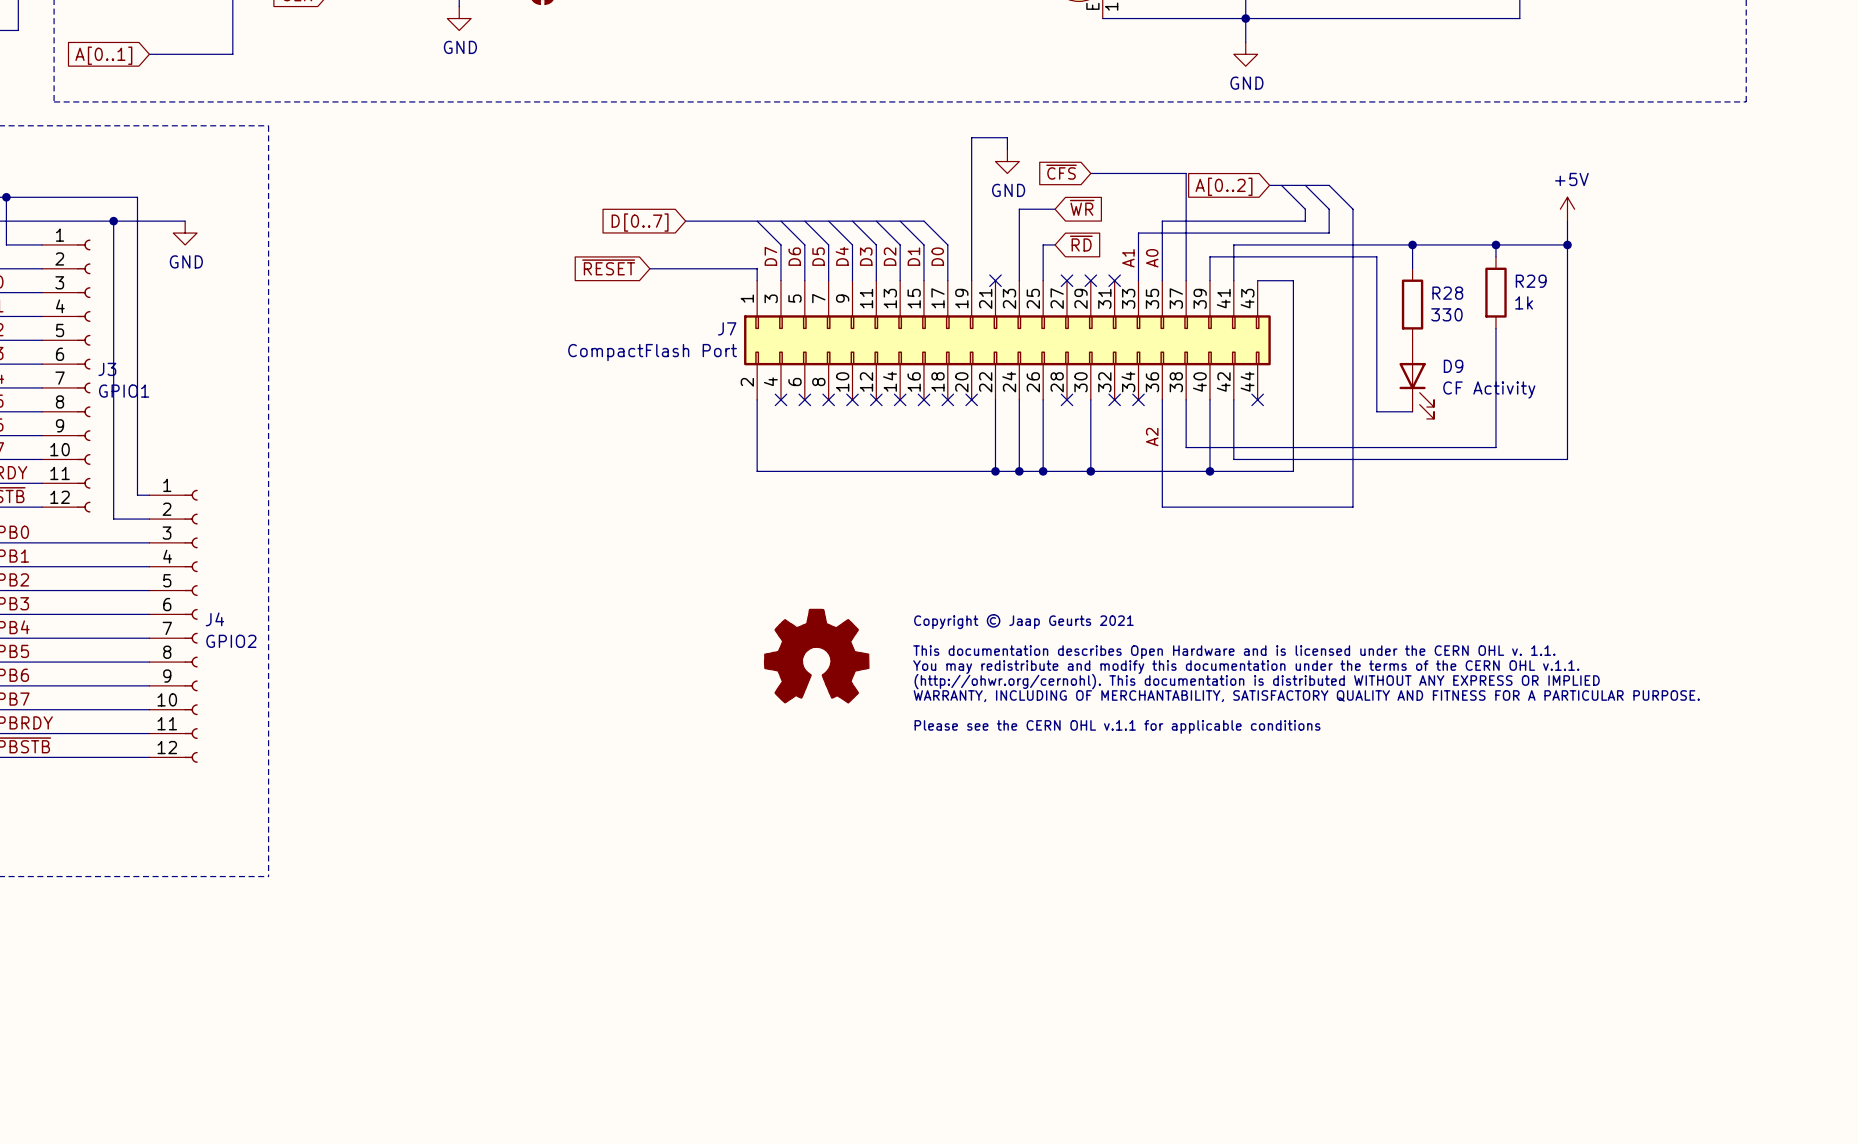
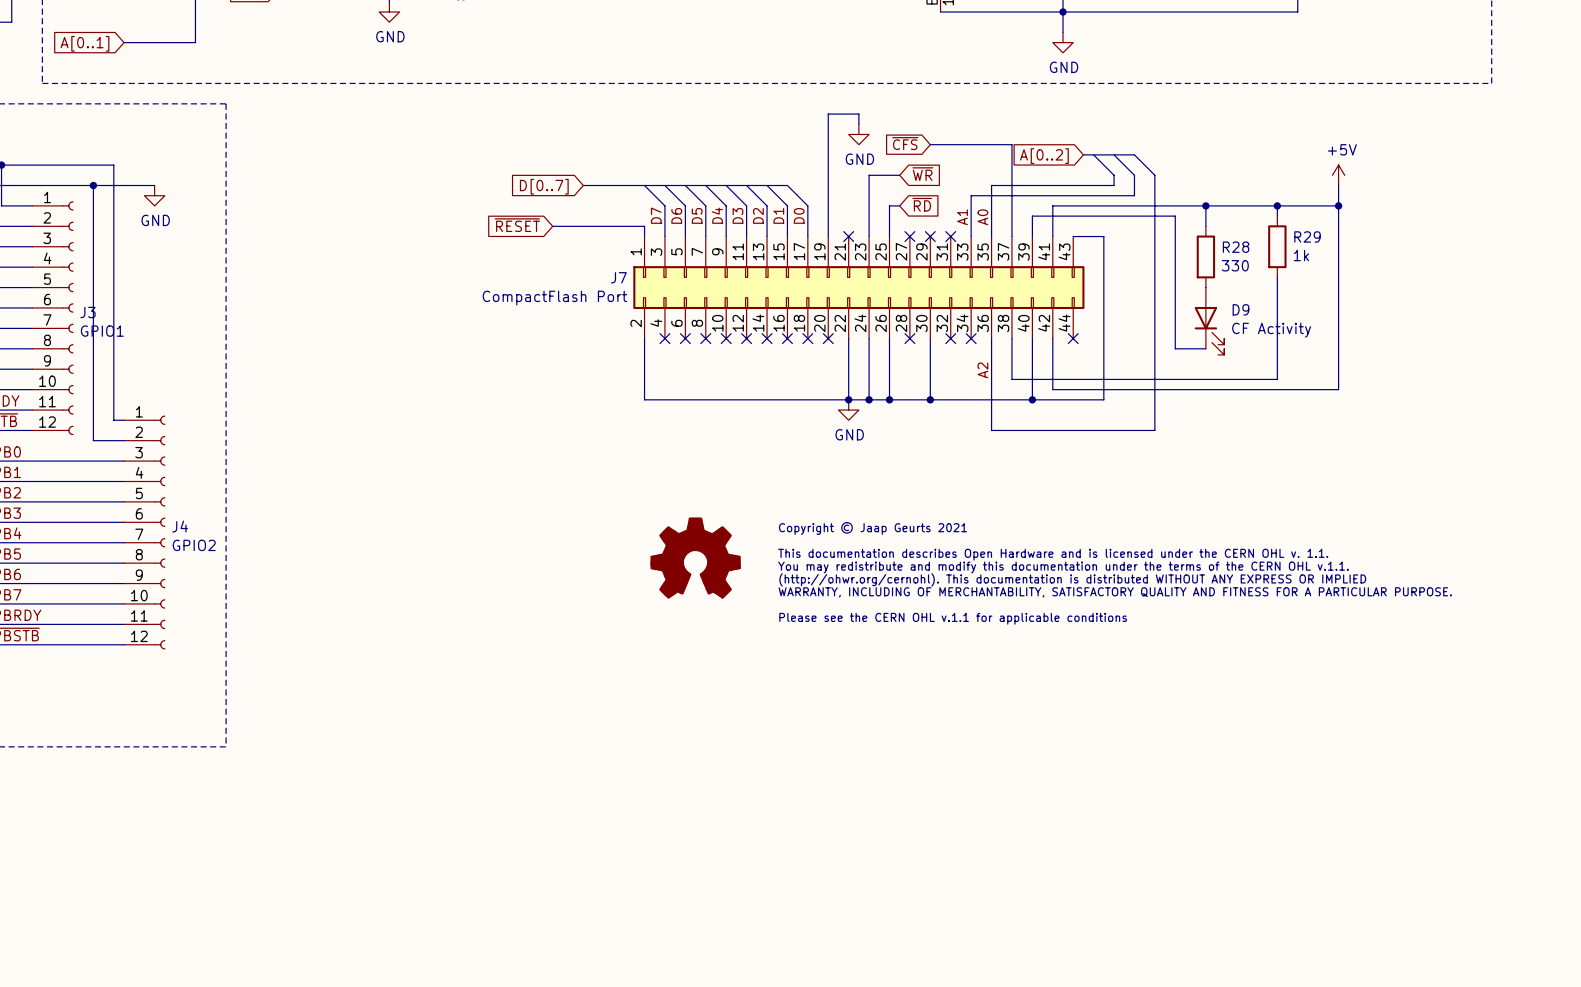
power symbol: none -> GND (848, 410)

